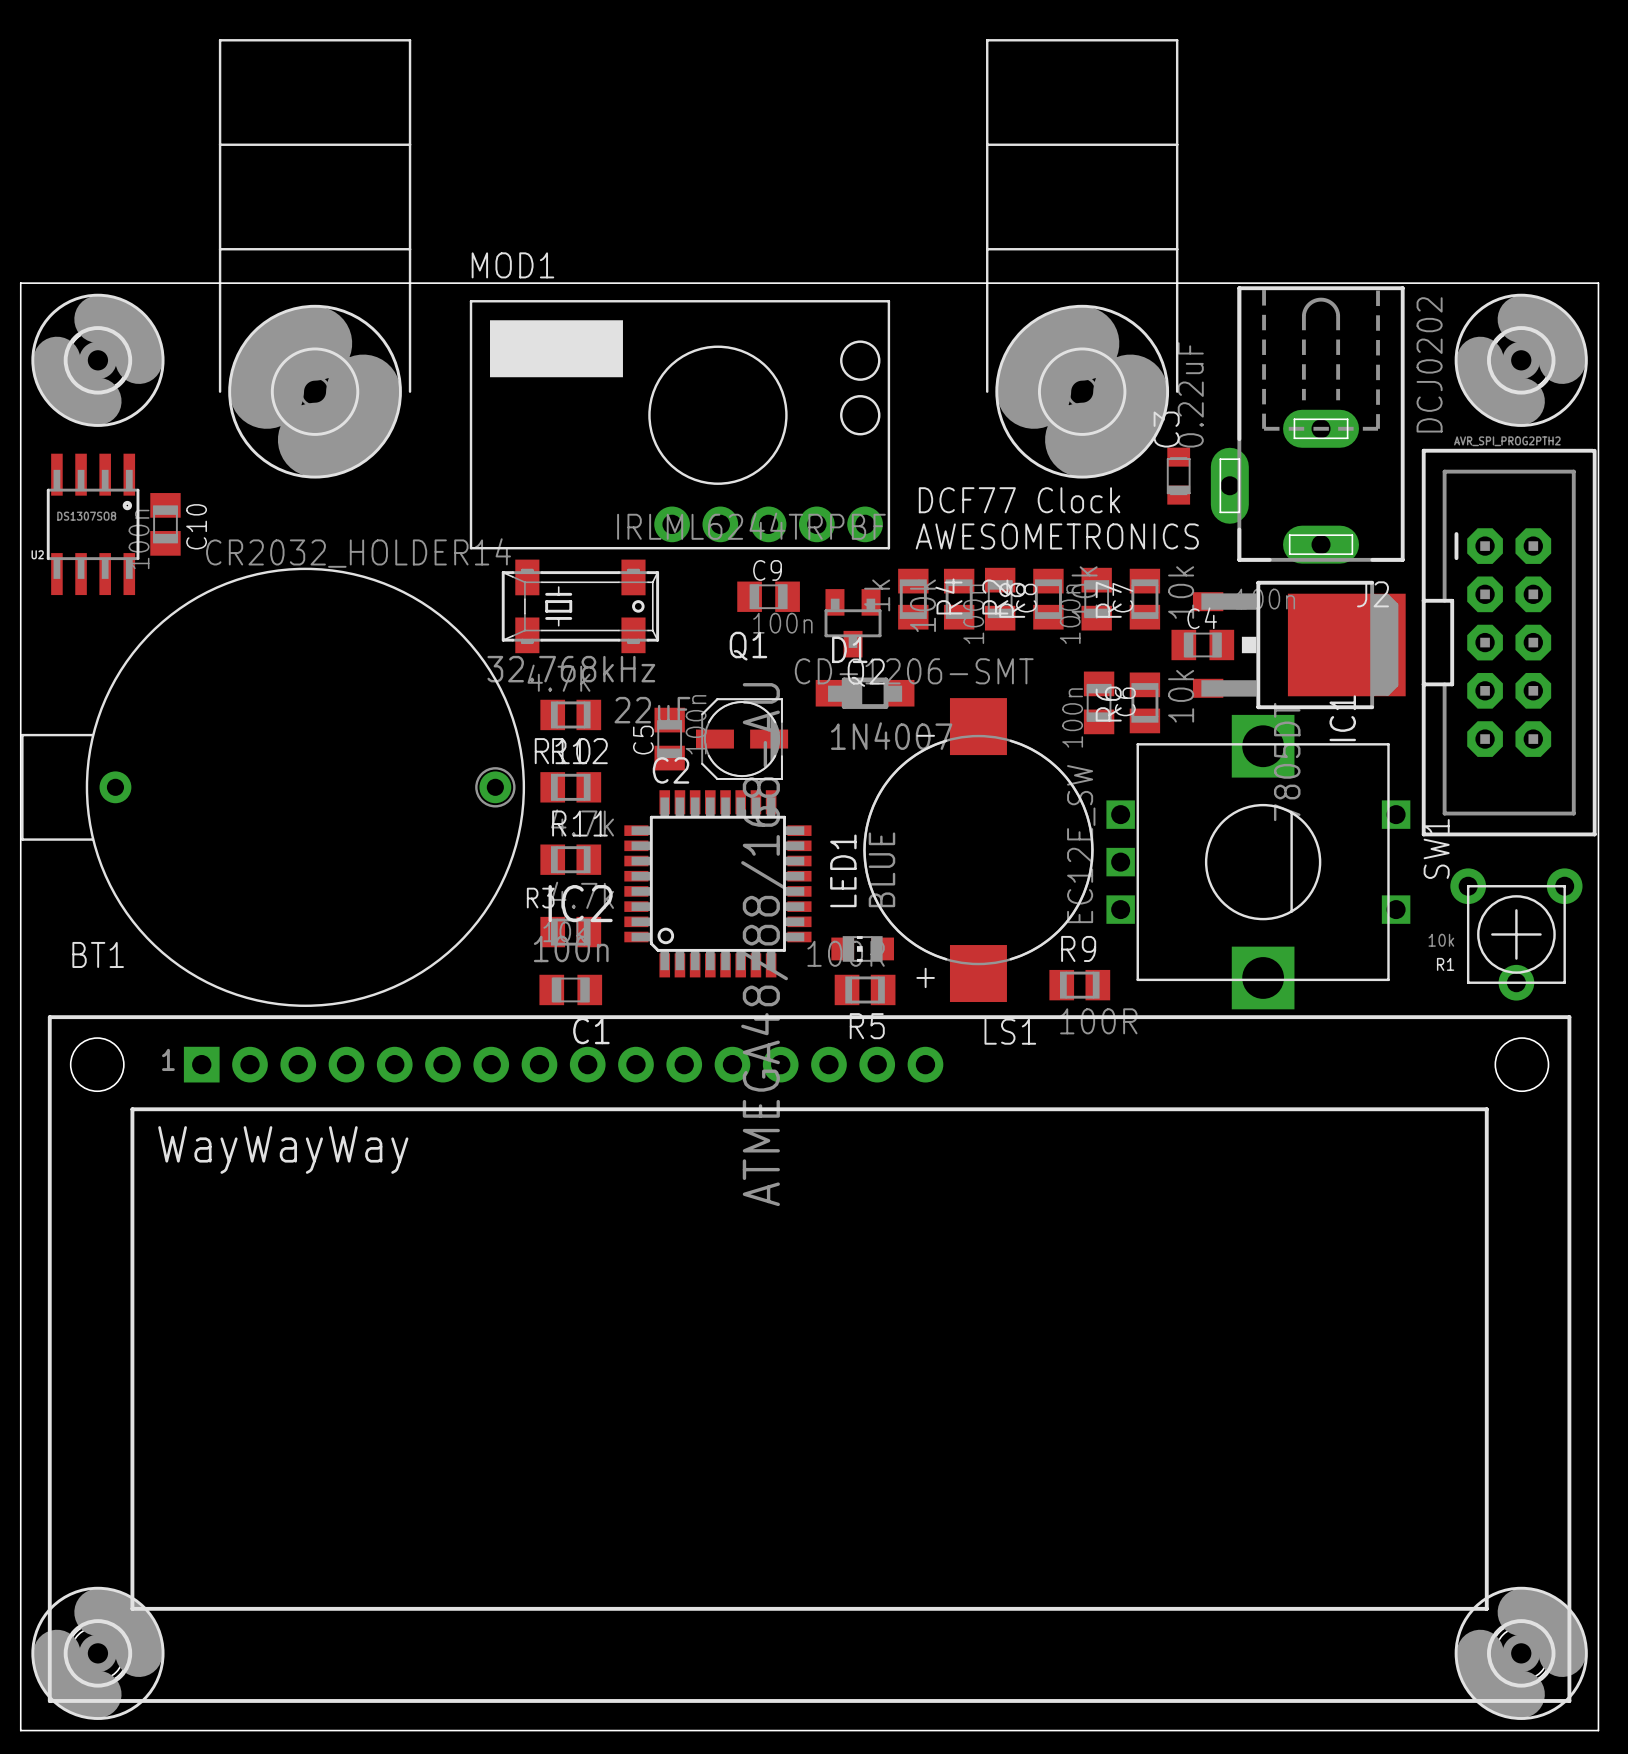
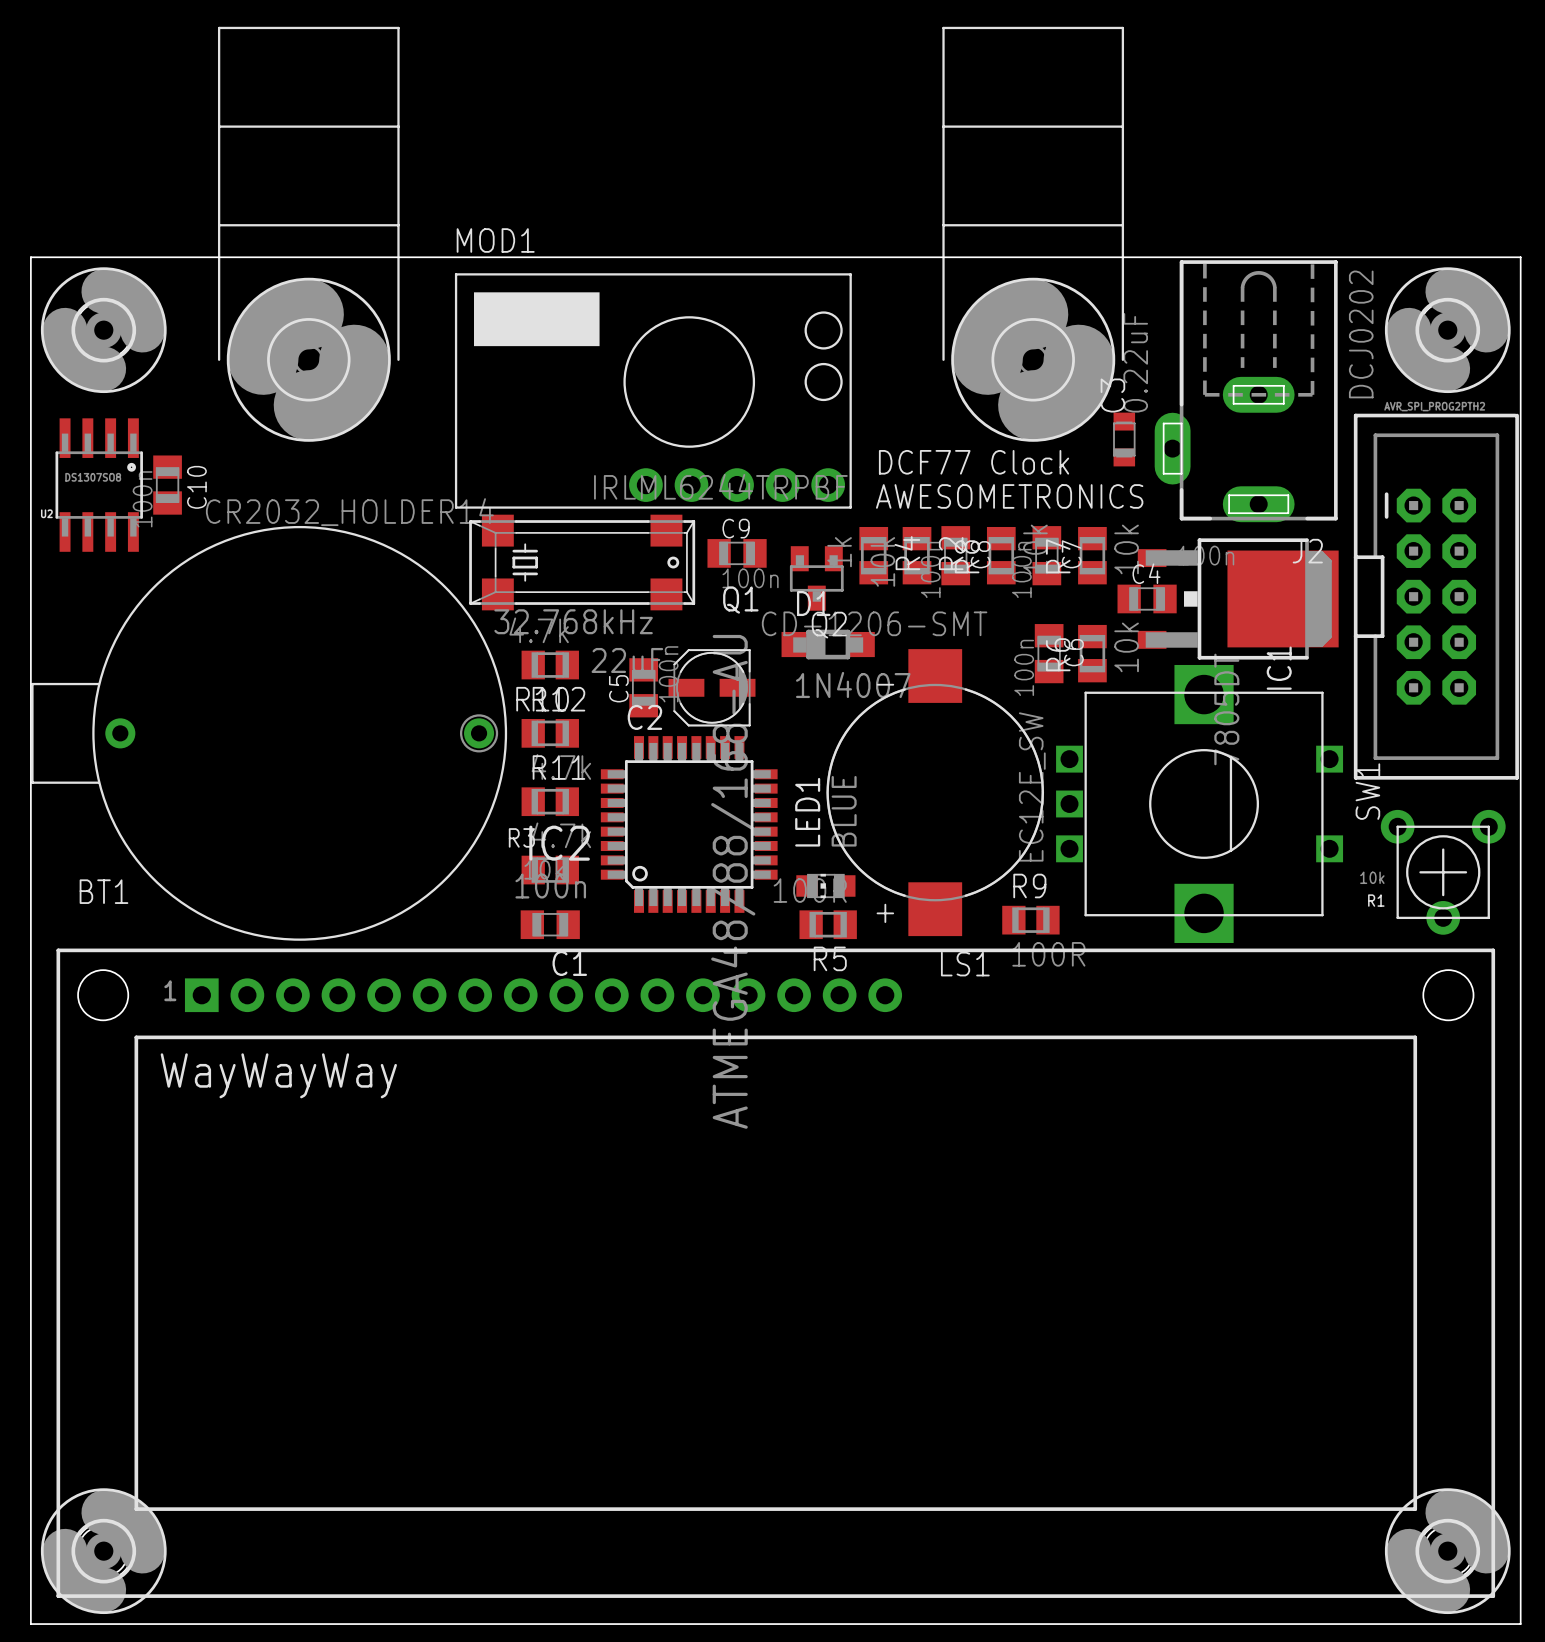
Q1 footprint: [501, 559, 660, 654] -> [469, 514, 696, 611]

